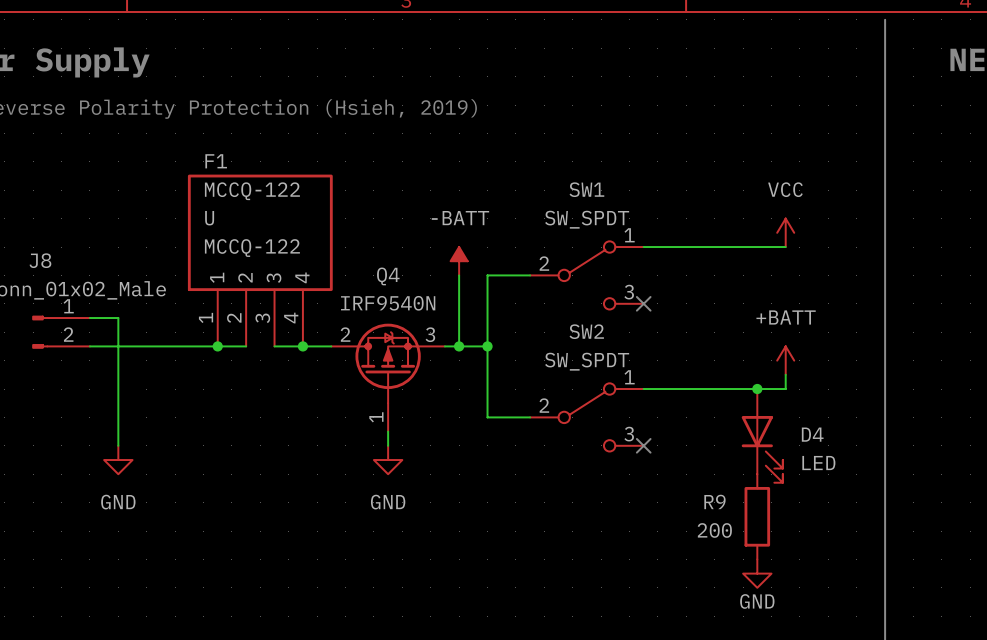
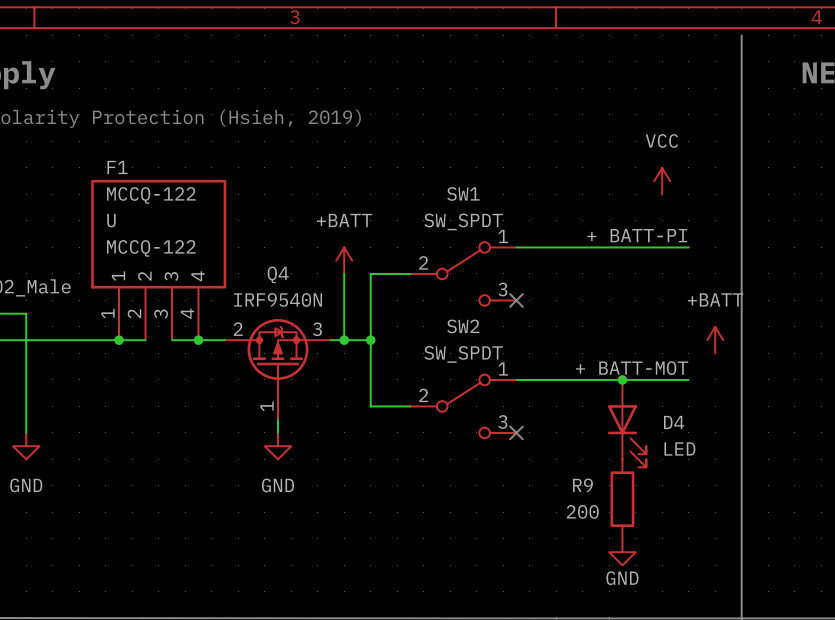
power symbol position: VCC (785, 232) -> VCC (662, 181)
label: none -> + BATT-PI (637, 235)
wire: none -> (648, 247) (688, 247)
power symbol: -BATT (459, 261) -> +BATT (344, 260)
power symbol position: +BATT (785, 360) -> +BATT (715, 340)
wire: (785, 374) (785, 389) -> (688, 379) (648, 379)
label: none -> + BATT-MOT (632, 368)

